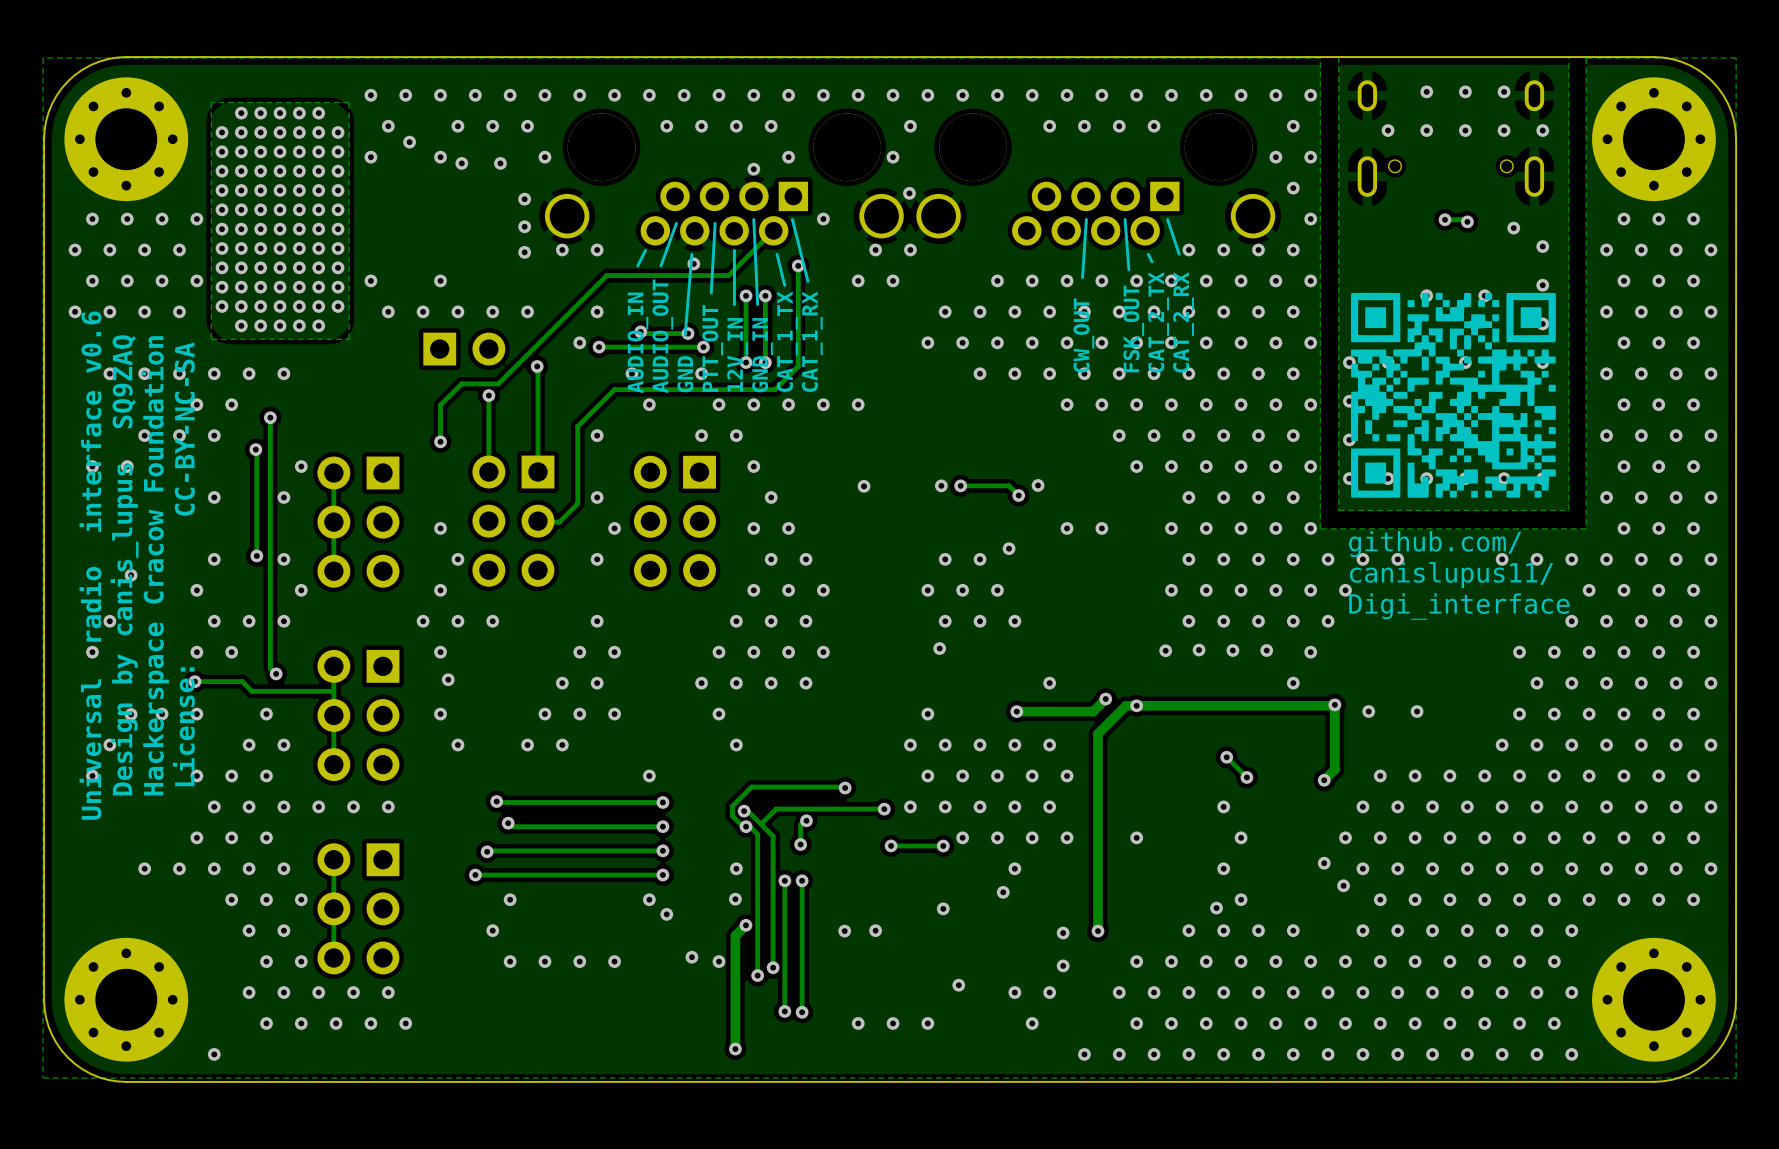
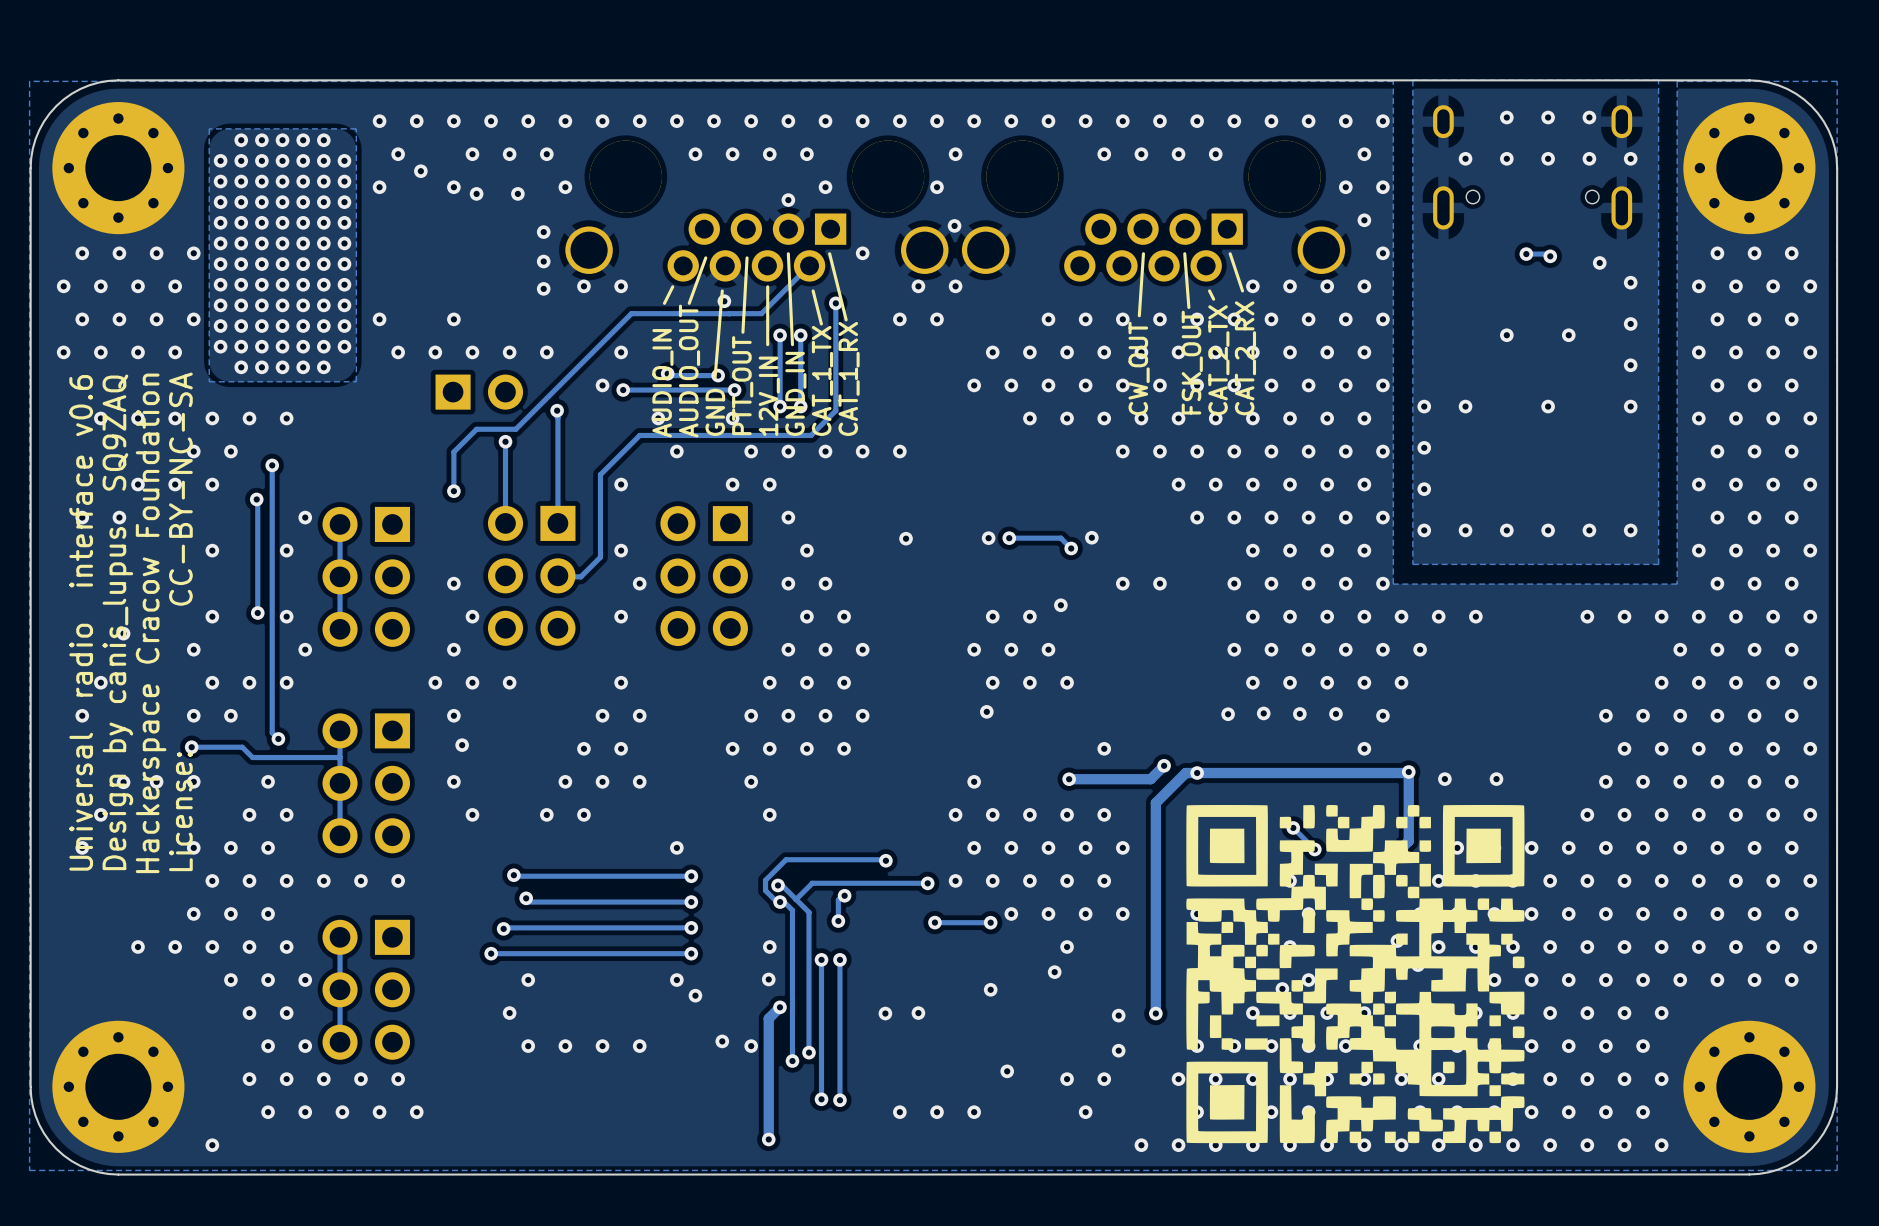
drawing: [1350, 292, 1556, 498] -> none
text: github.com/ (1435, 544) -> none
text: canislupus11/ (1451, 575) -> none
text: Digi_interface (1459, 606) -> none
drawing: none -> [1186, 804, 1525, 1144]

